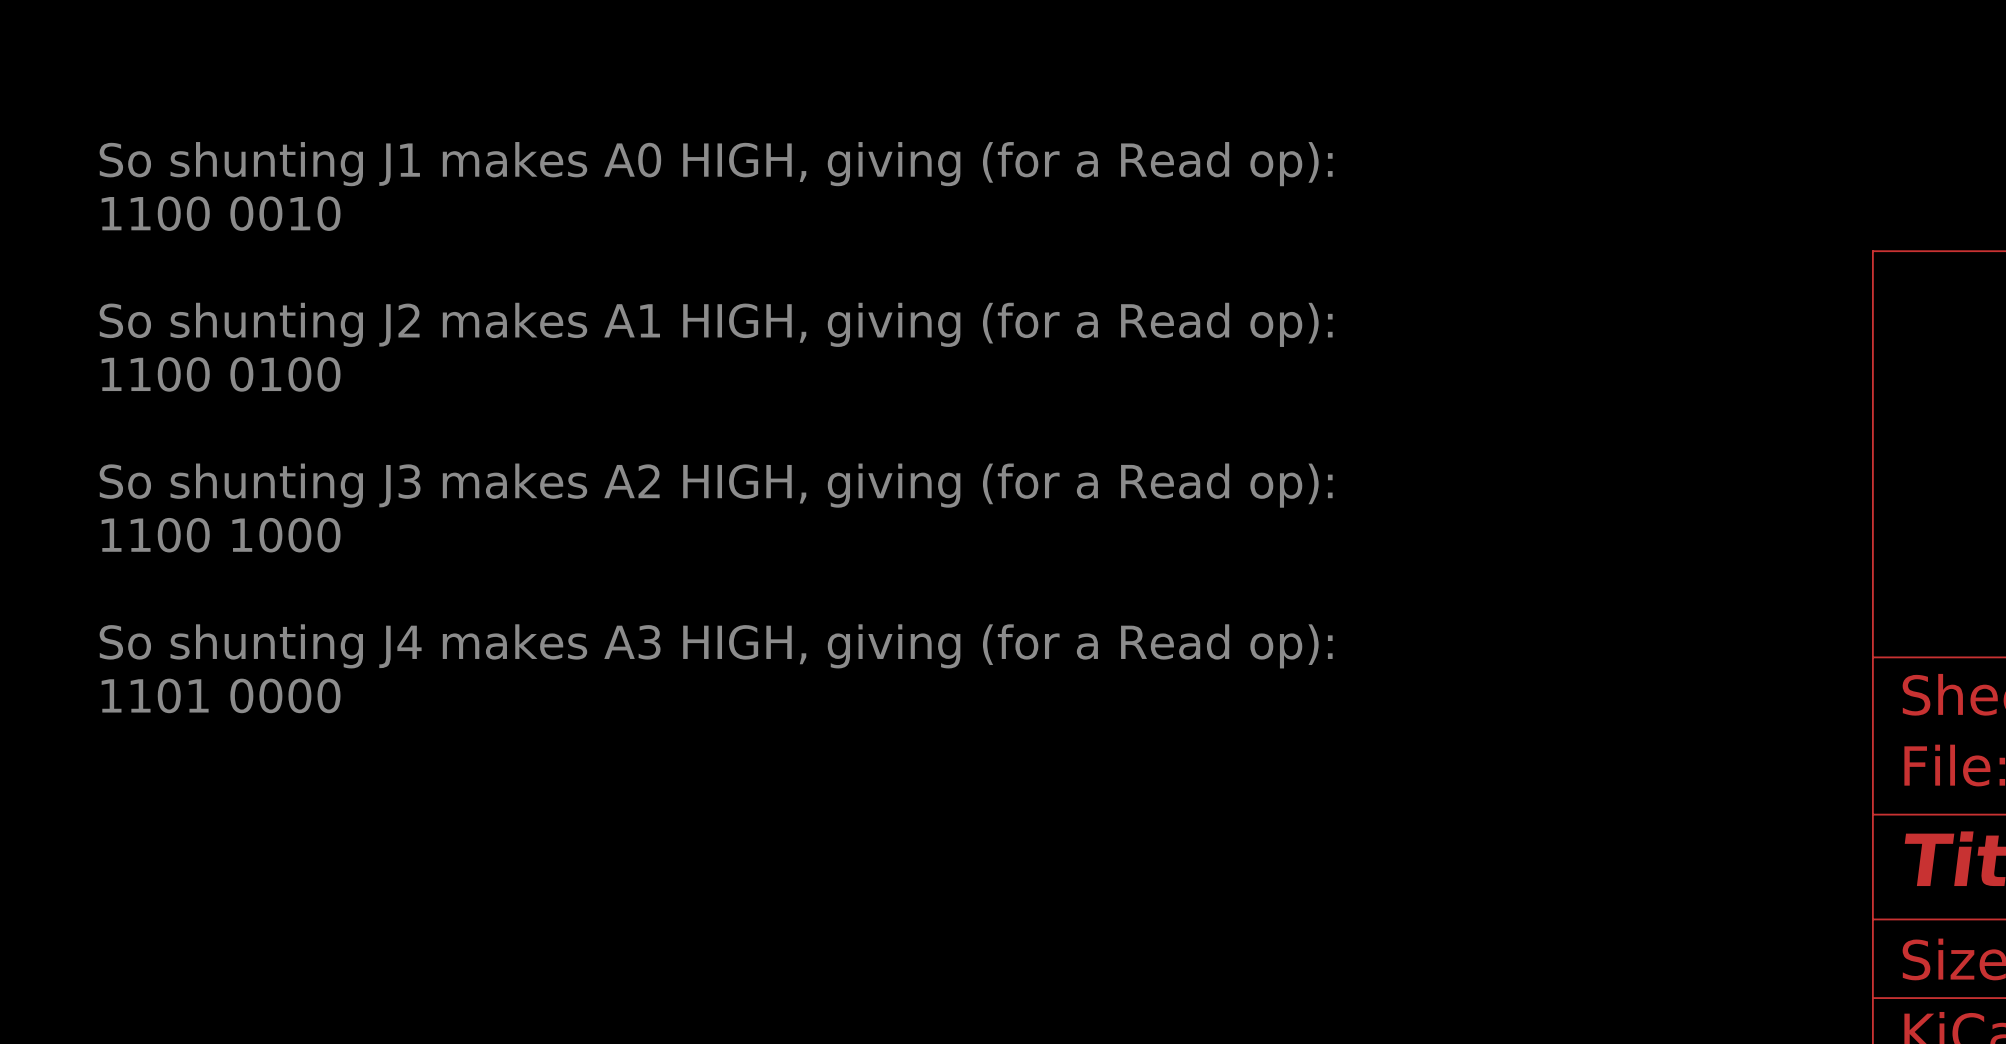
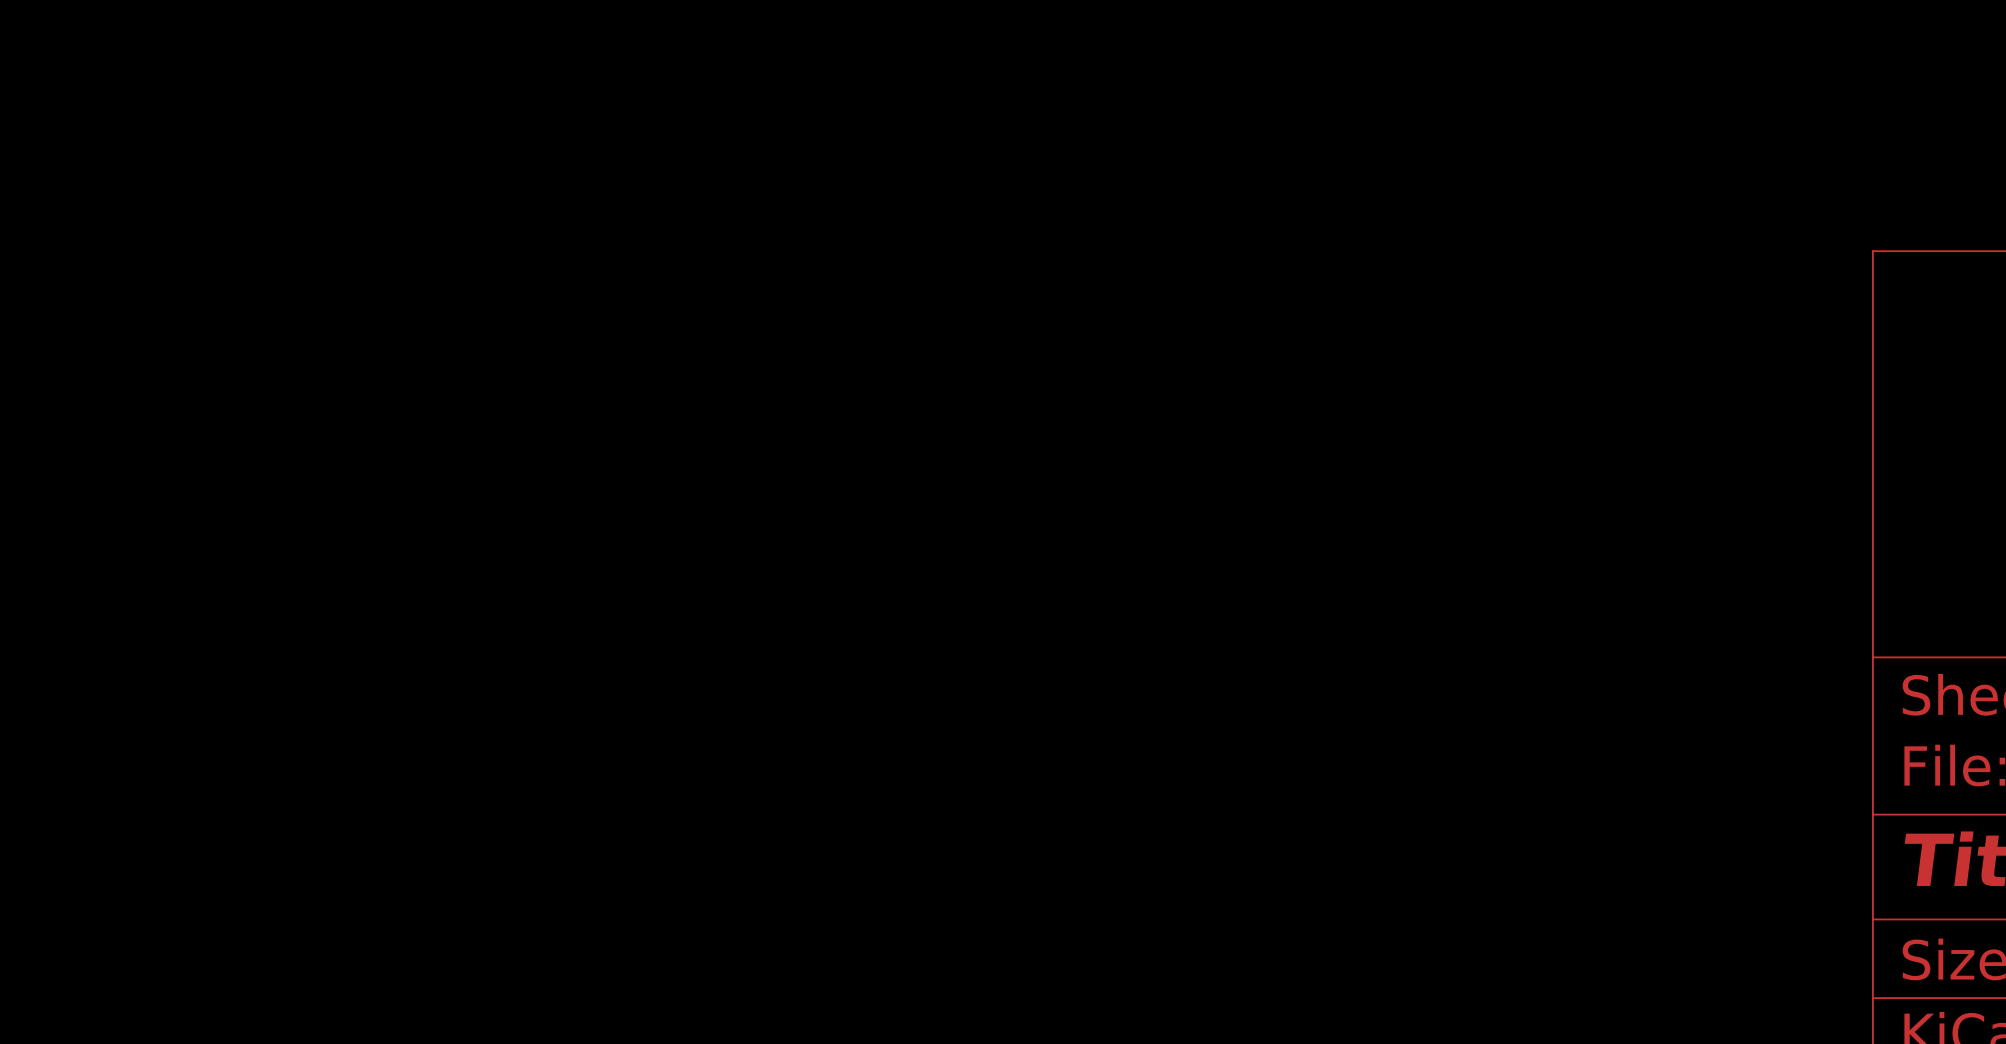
text: So shunting J1 makes A0 HIGH, giving (for a Read op): (716, 164) -> none
text: 1100 0010 (221, 213) -> none
text: So shunting J2 makes A1 HIGH, giving (for a Read op): (716, 324) -> none
text: 1100 0100 (221, 374) -> none
text: So shunting J3 makes A2 HIGH, giving (for a Read op): (716, 485) -> none
text: 1100 1000 (221, 535) -> none
text: So shunting J4 makes A3 HIGH, giving (for a Read op): (716, 646) -> none
text: 1101 0000 (221, 695) -> none

